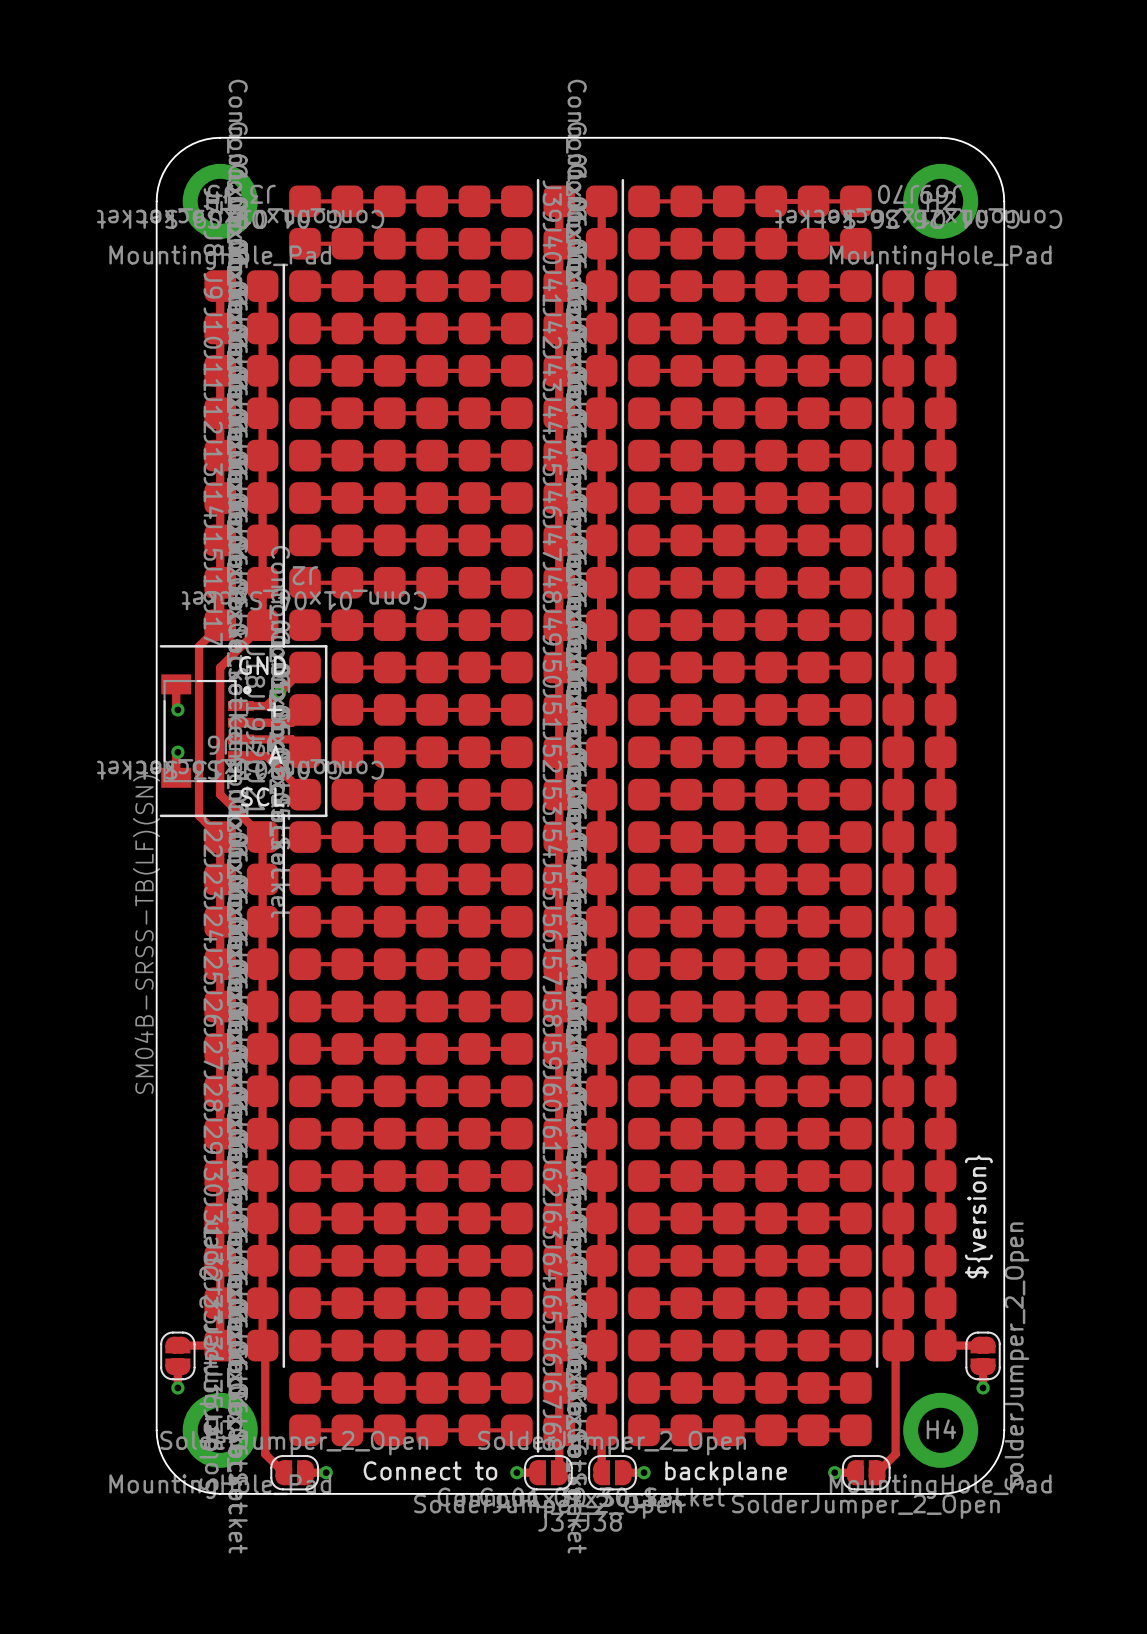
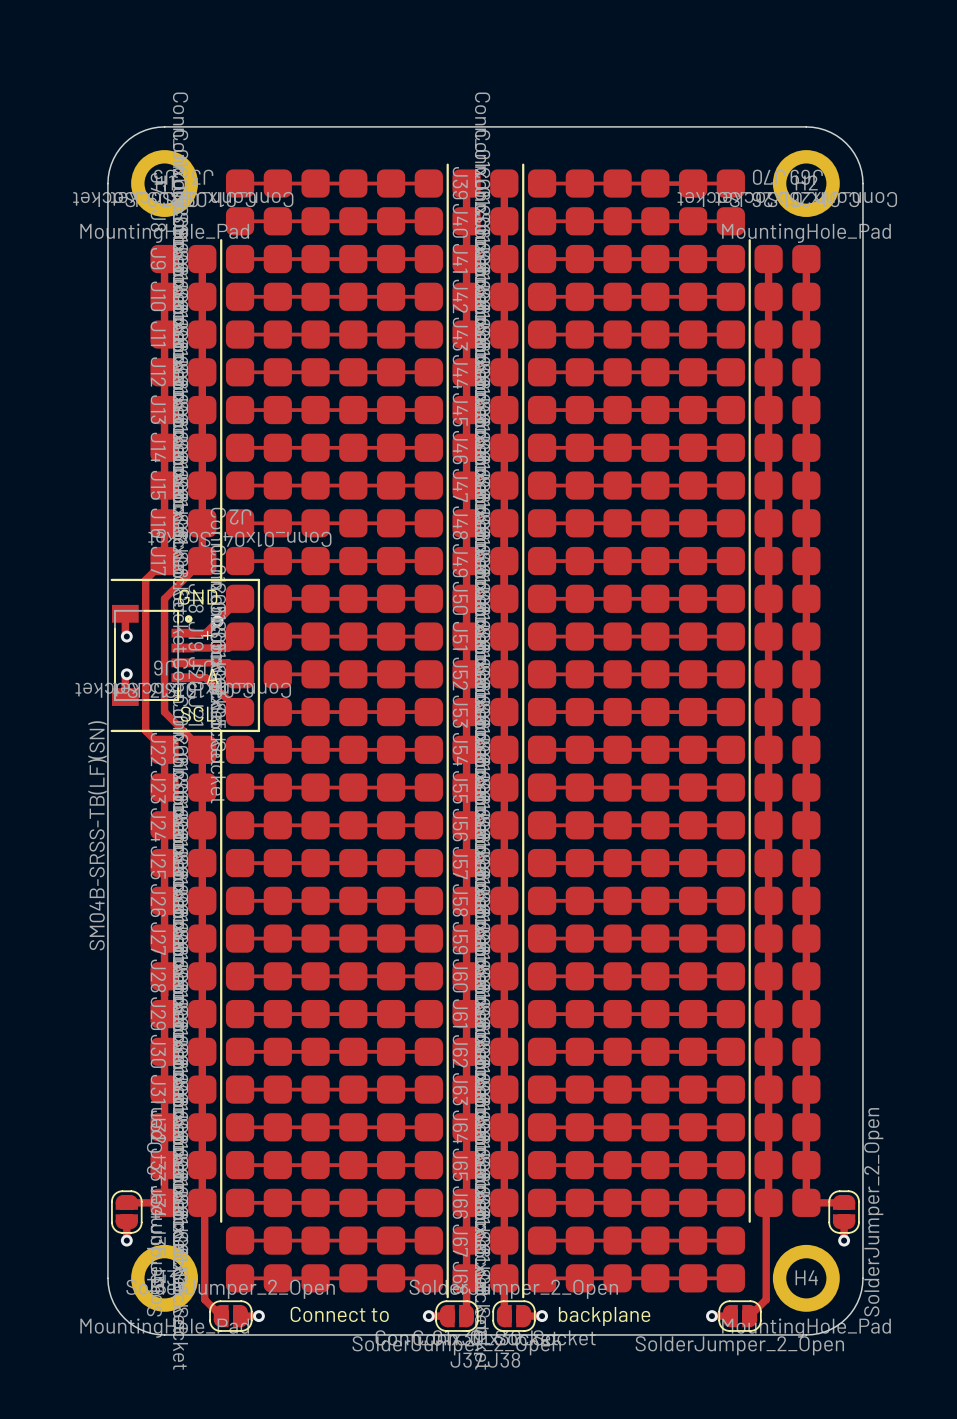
text: ${version} (978, 1216) -> none

